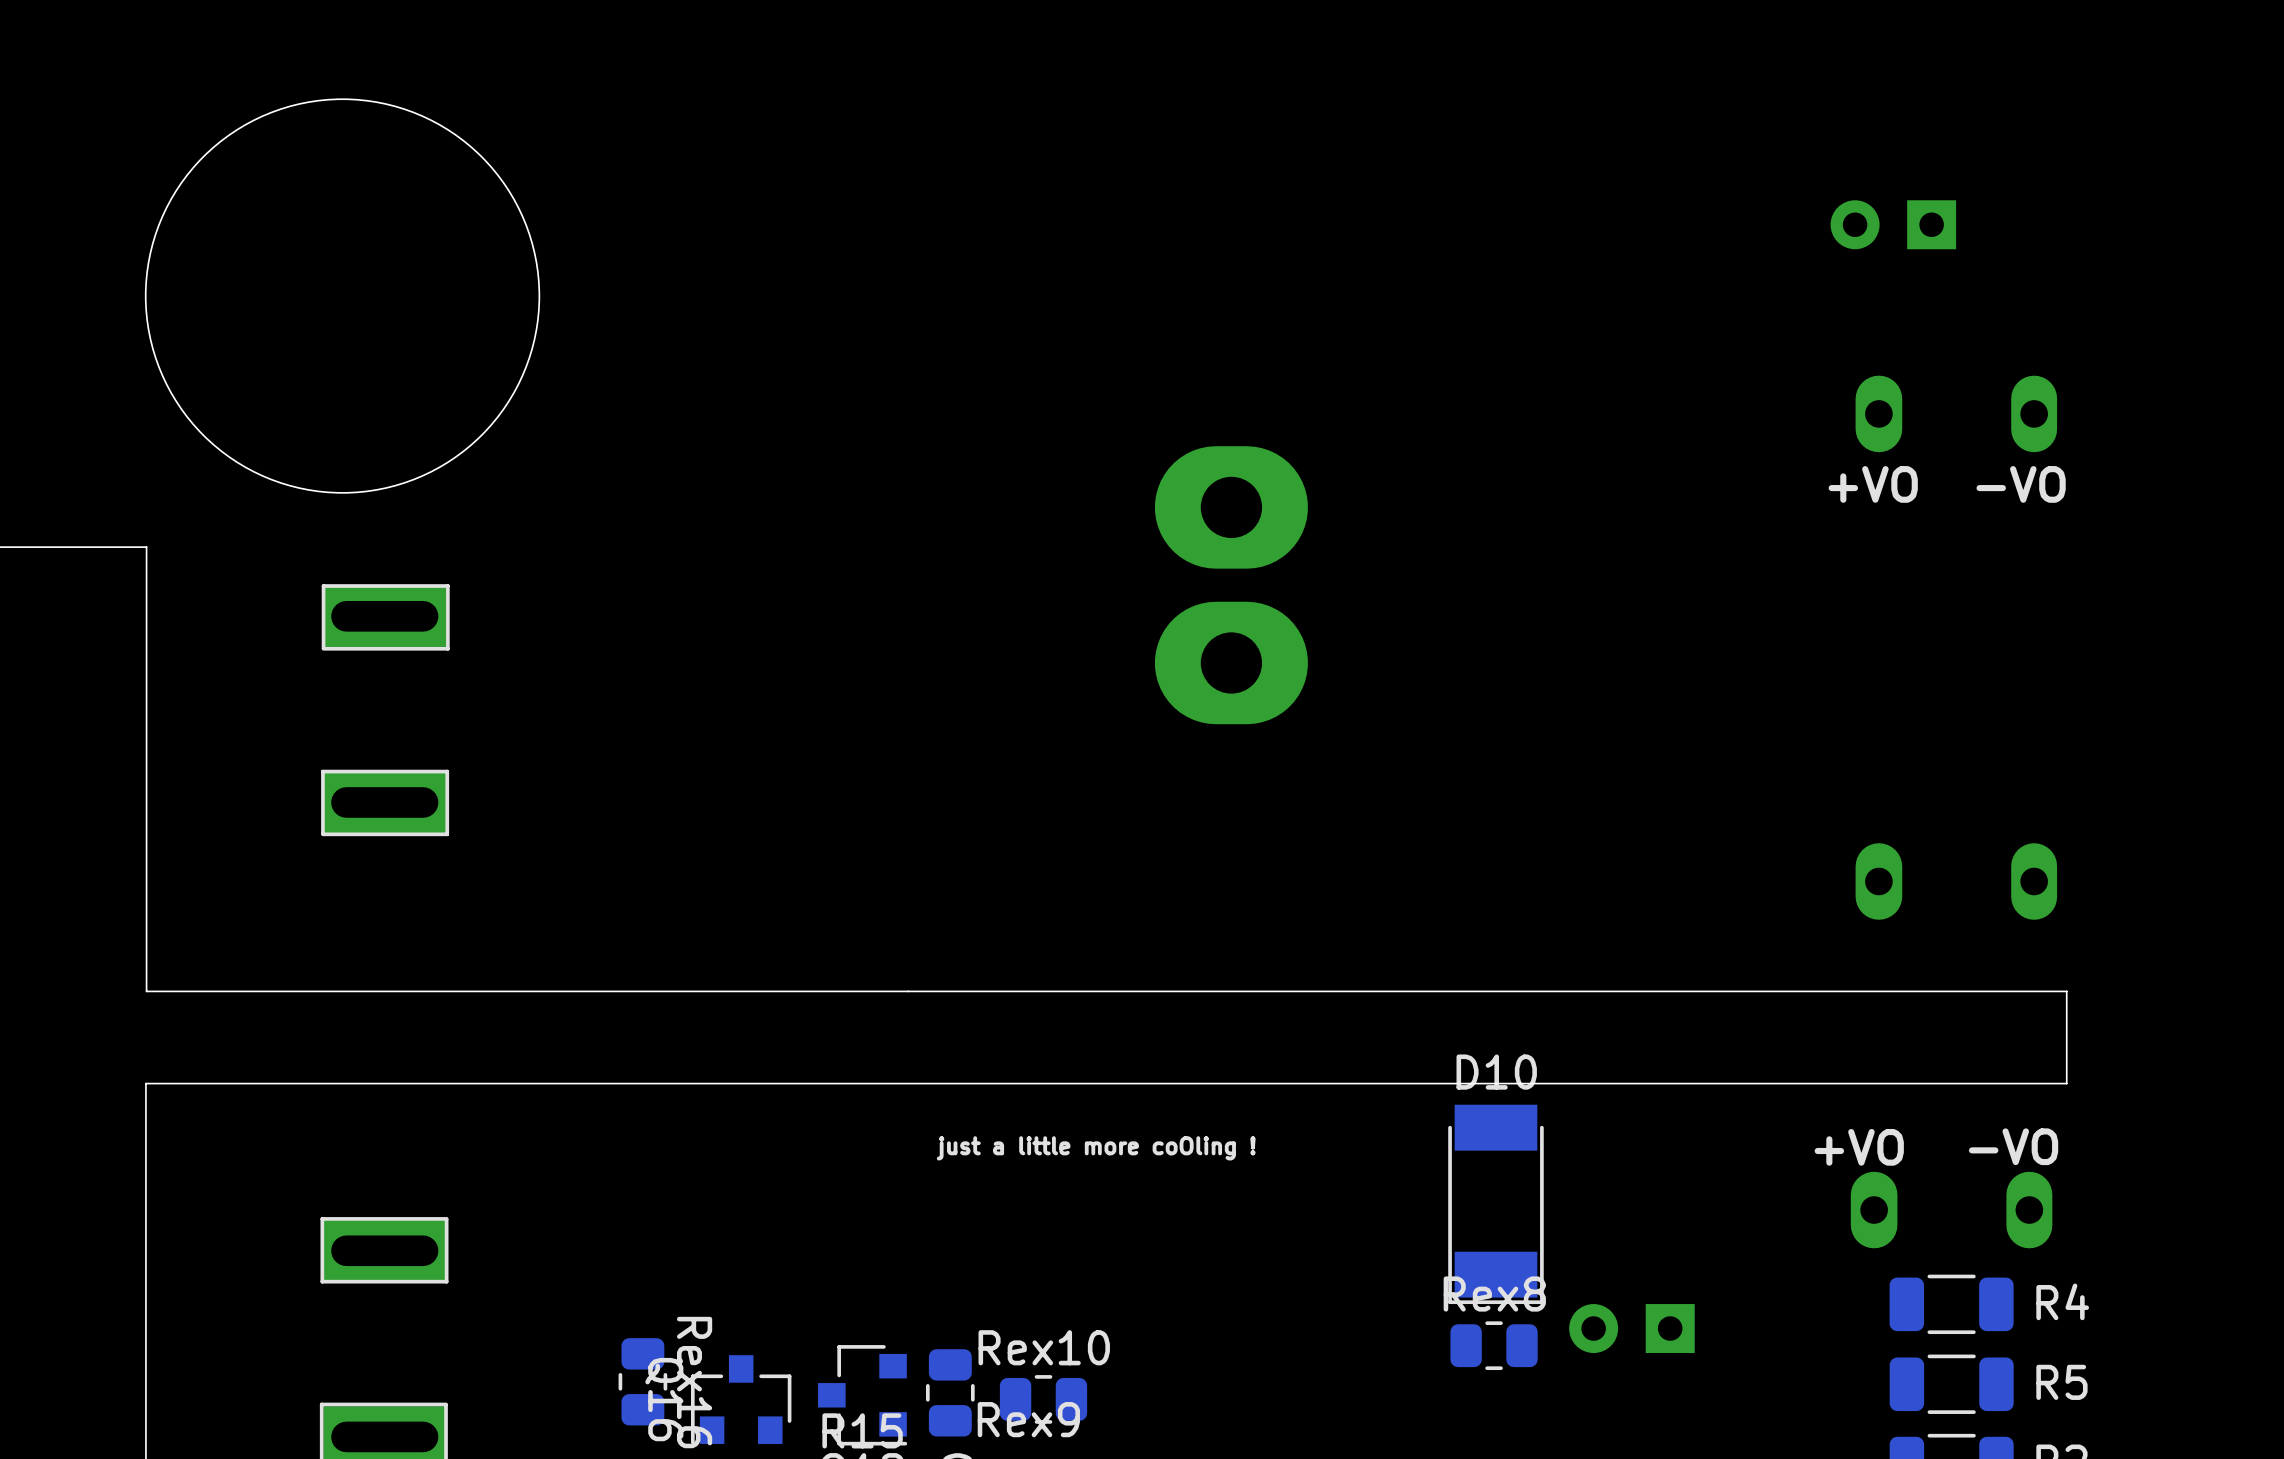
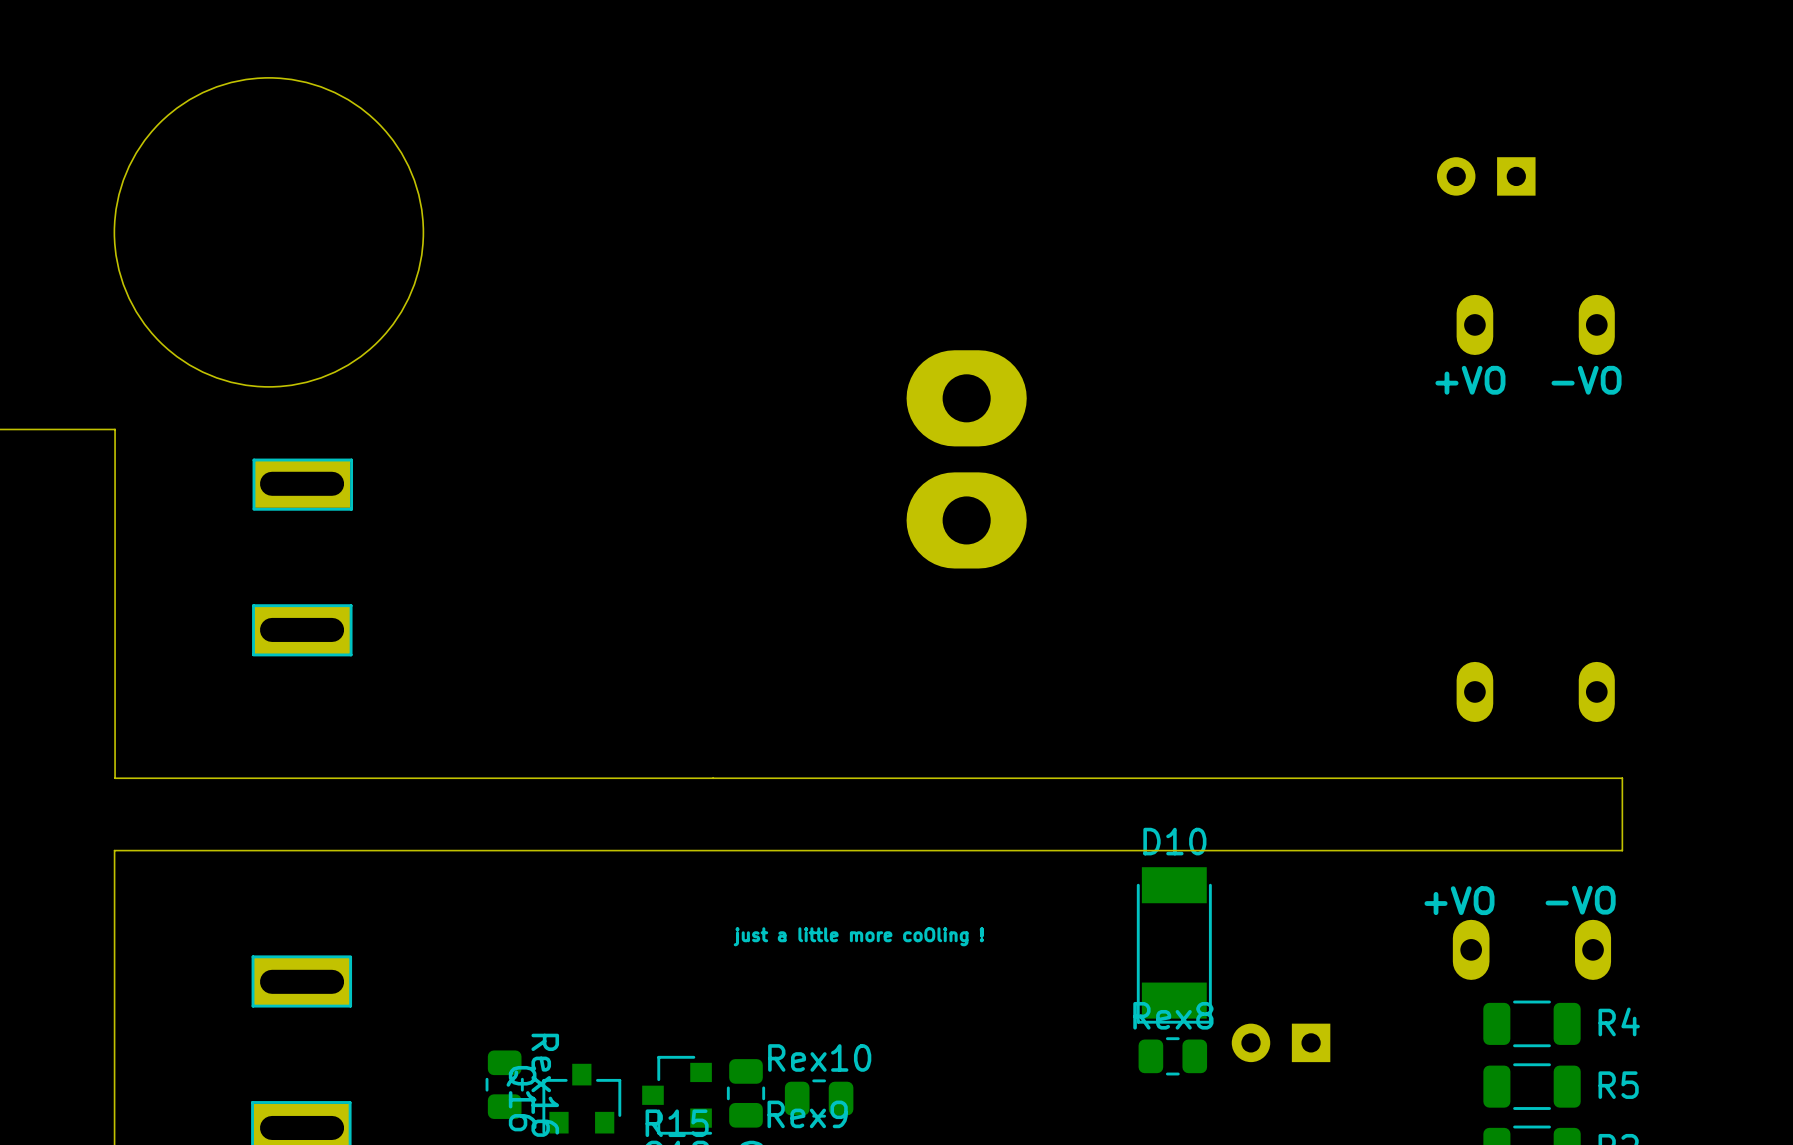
text position: just a little more coOling ! (1096, 1148) -> just a little more coOling ! (858, 936)

